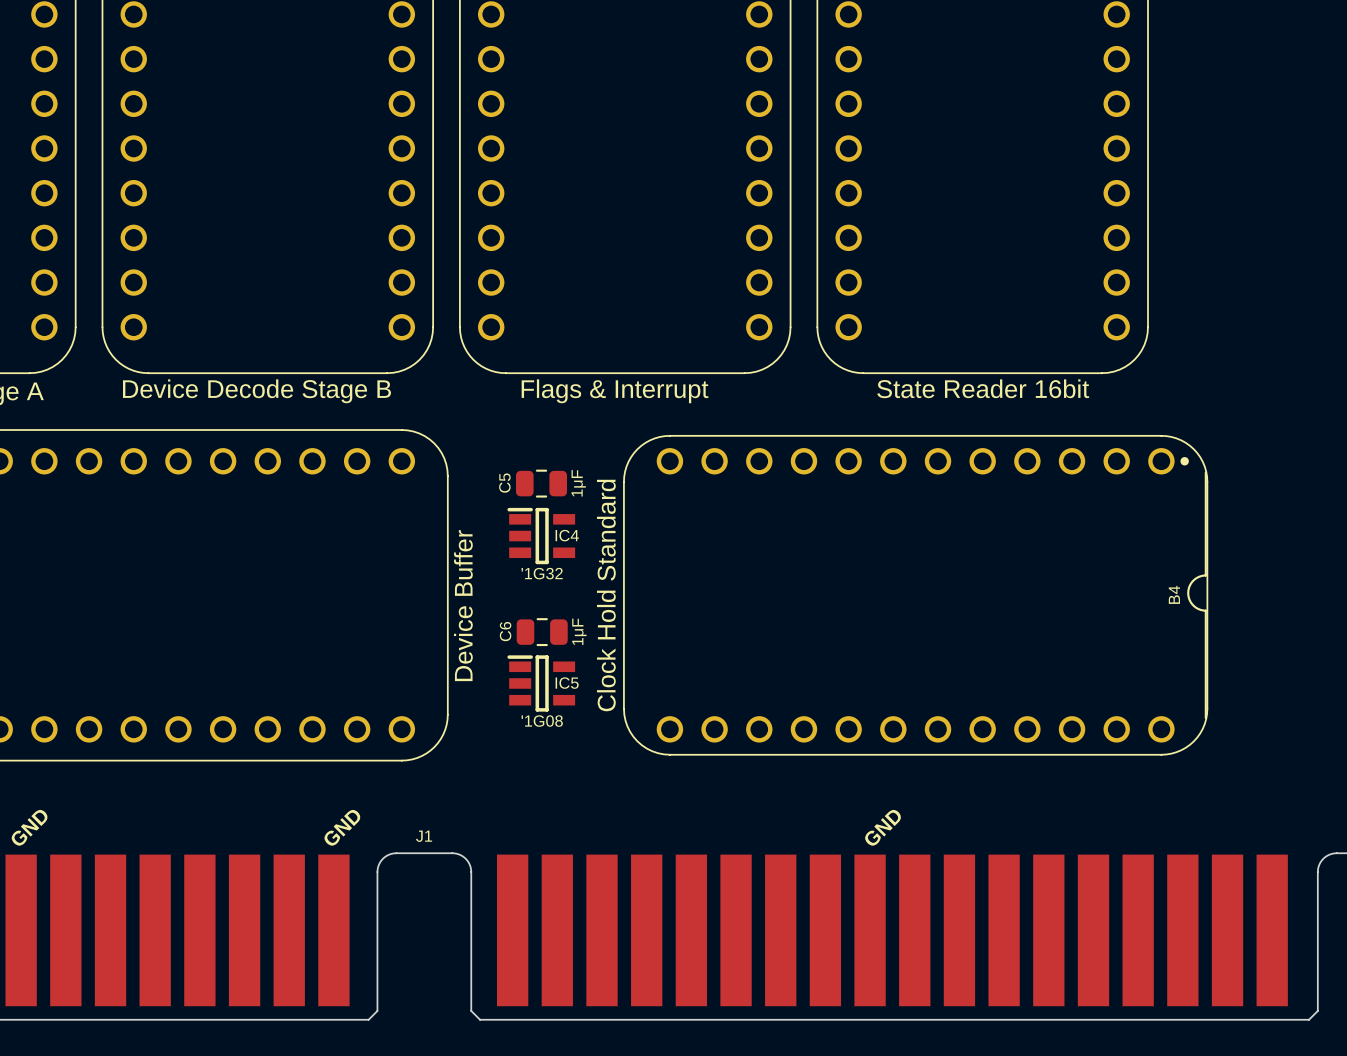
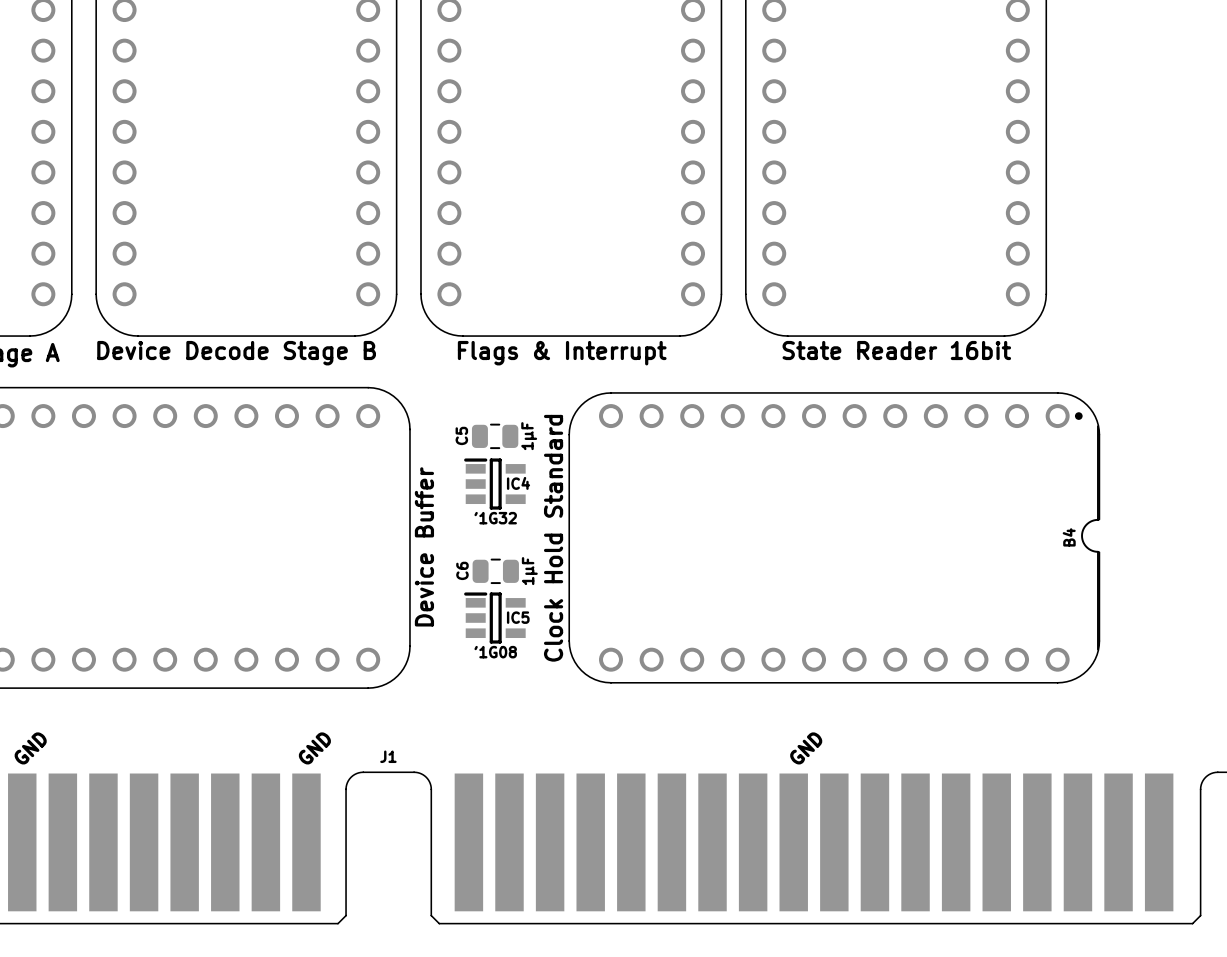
B4 footprint: [623, 434, 1209, 756] -> [568, 392, 1101, 684]

